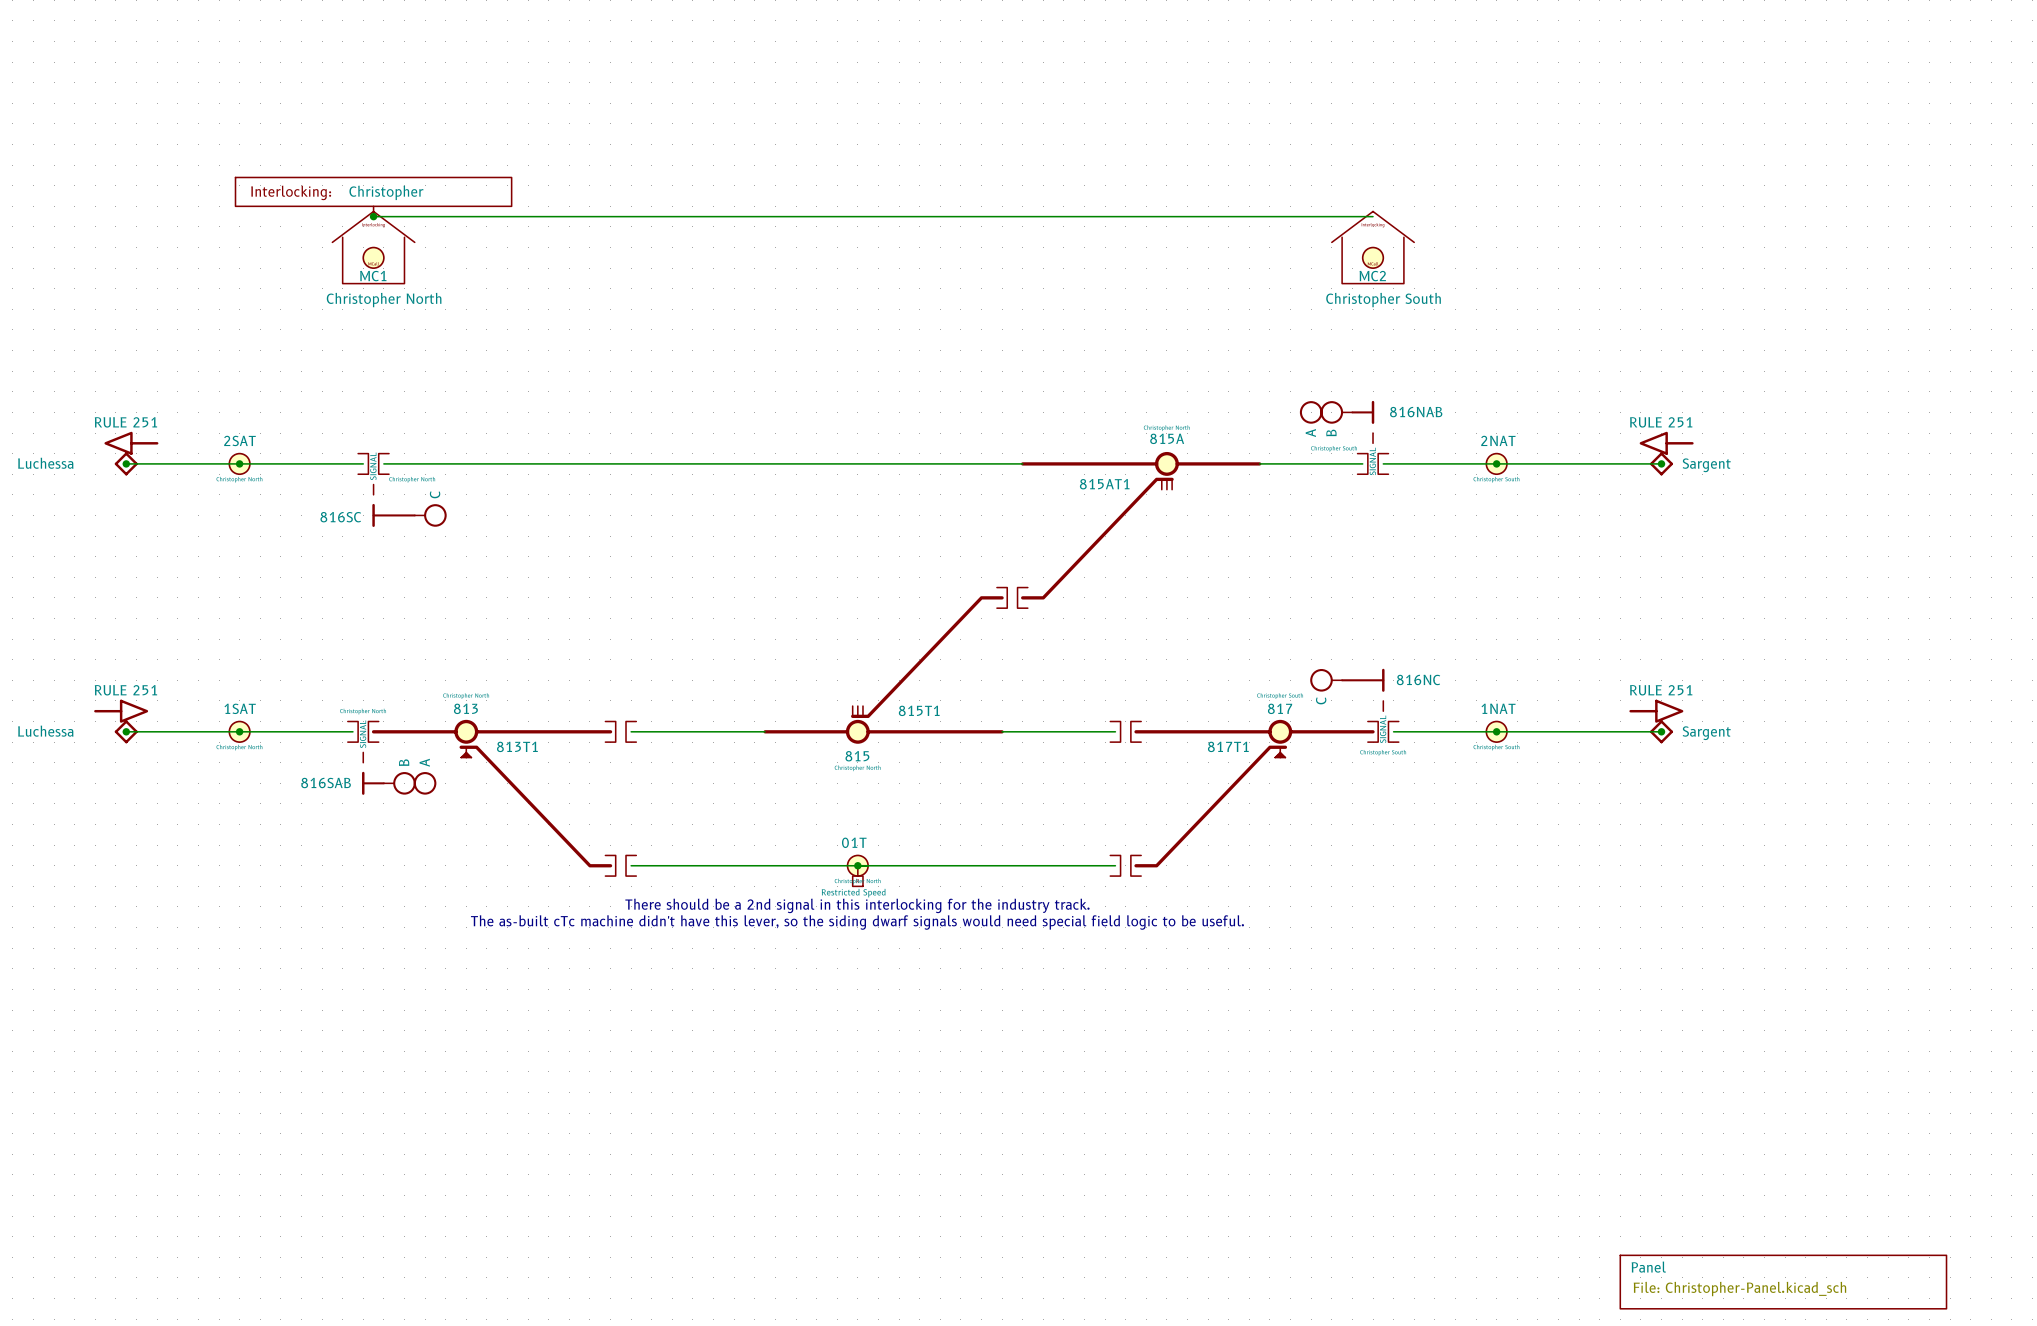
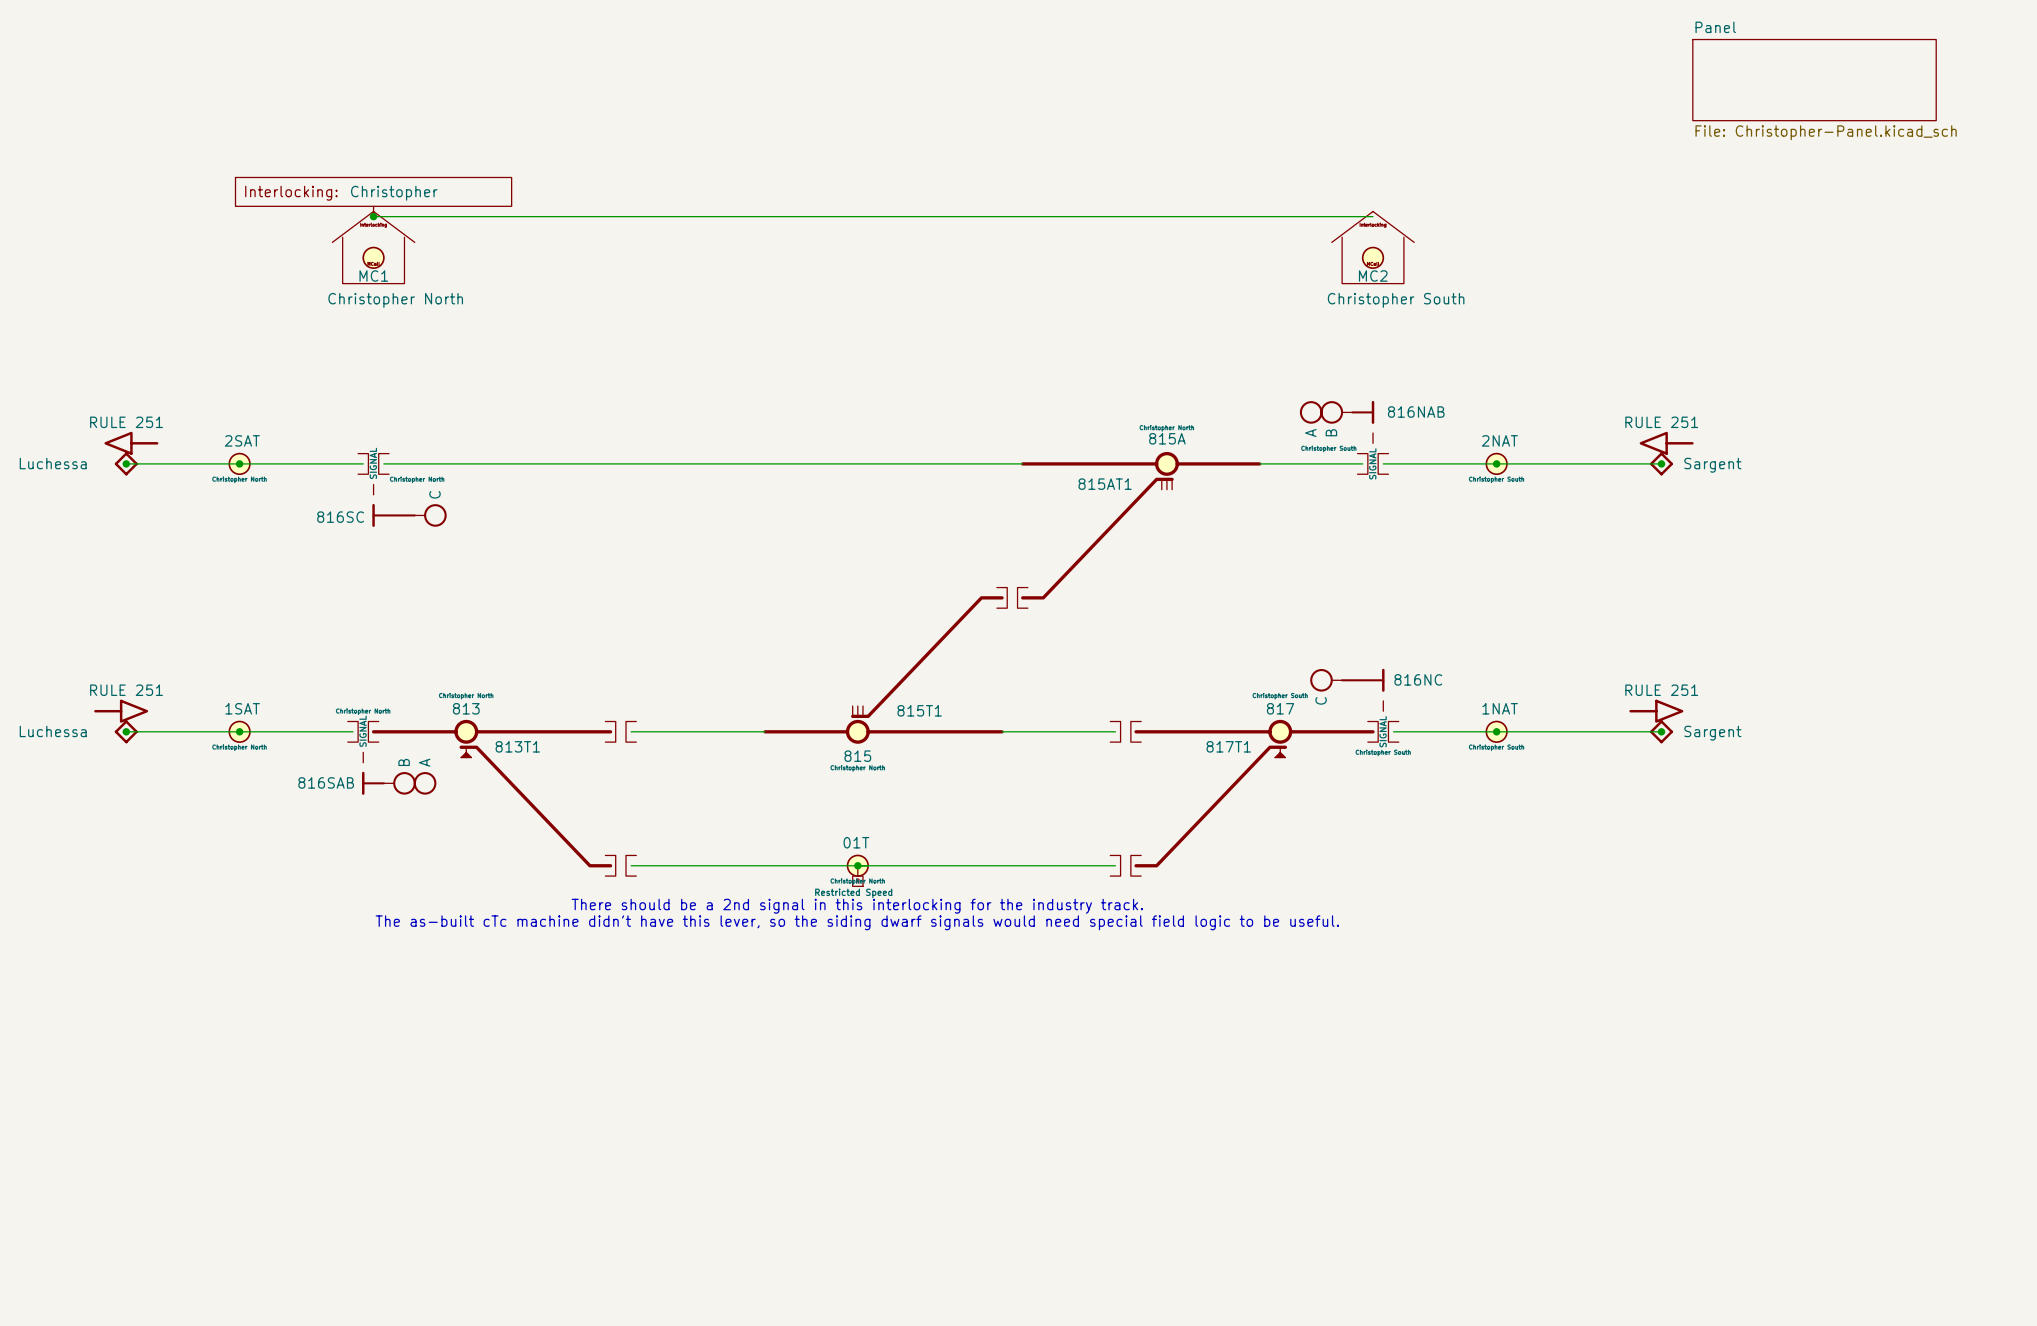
sheet Panel: none -> File: Christopher-Panel.kicad_sch (1814, 80)
sheet Panel: File: Christopher-Panel.kicad_sch (1783, 1282) -> none

